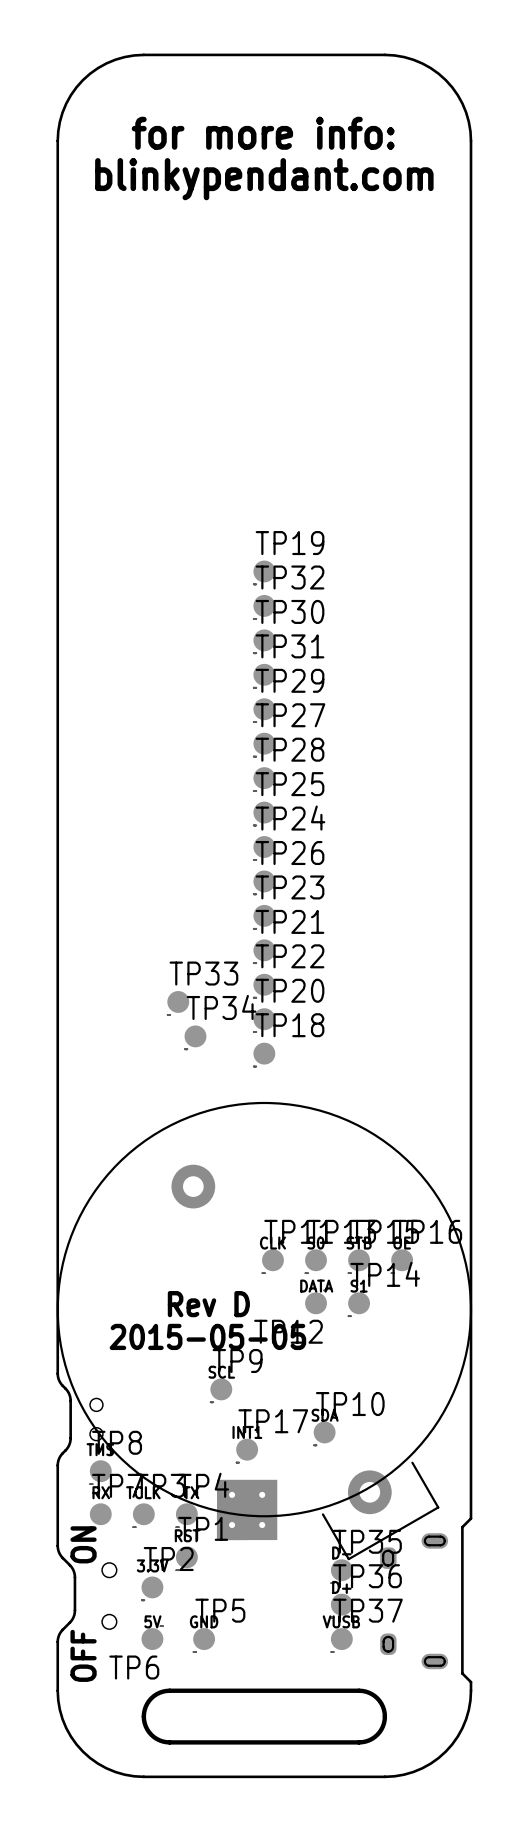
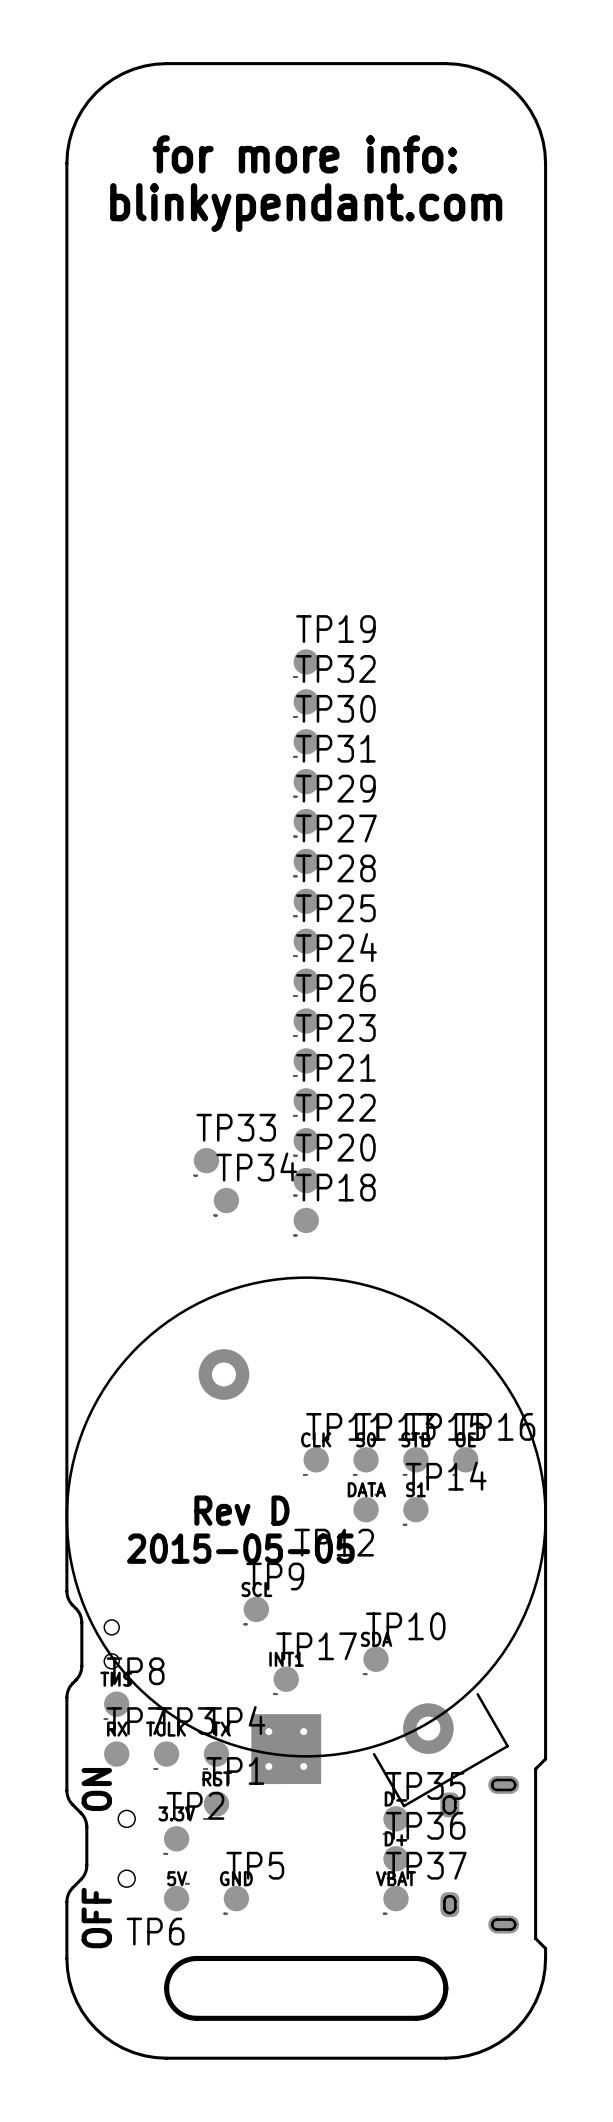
text: VUSB (341, 1621) -> VBAT (395, 1878)

